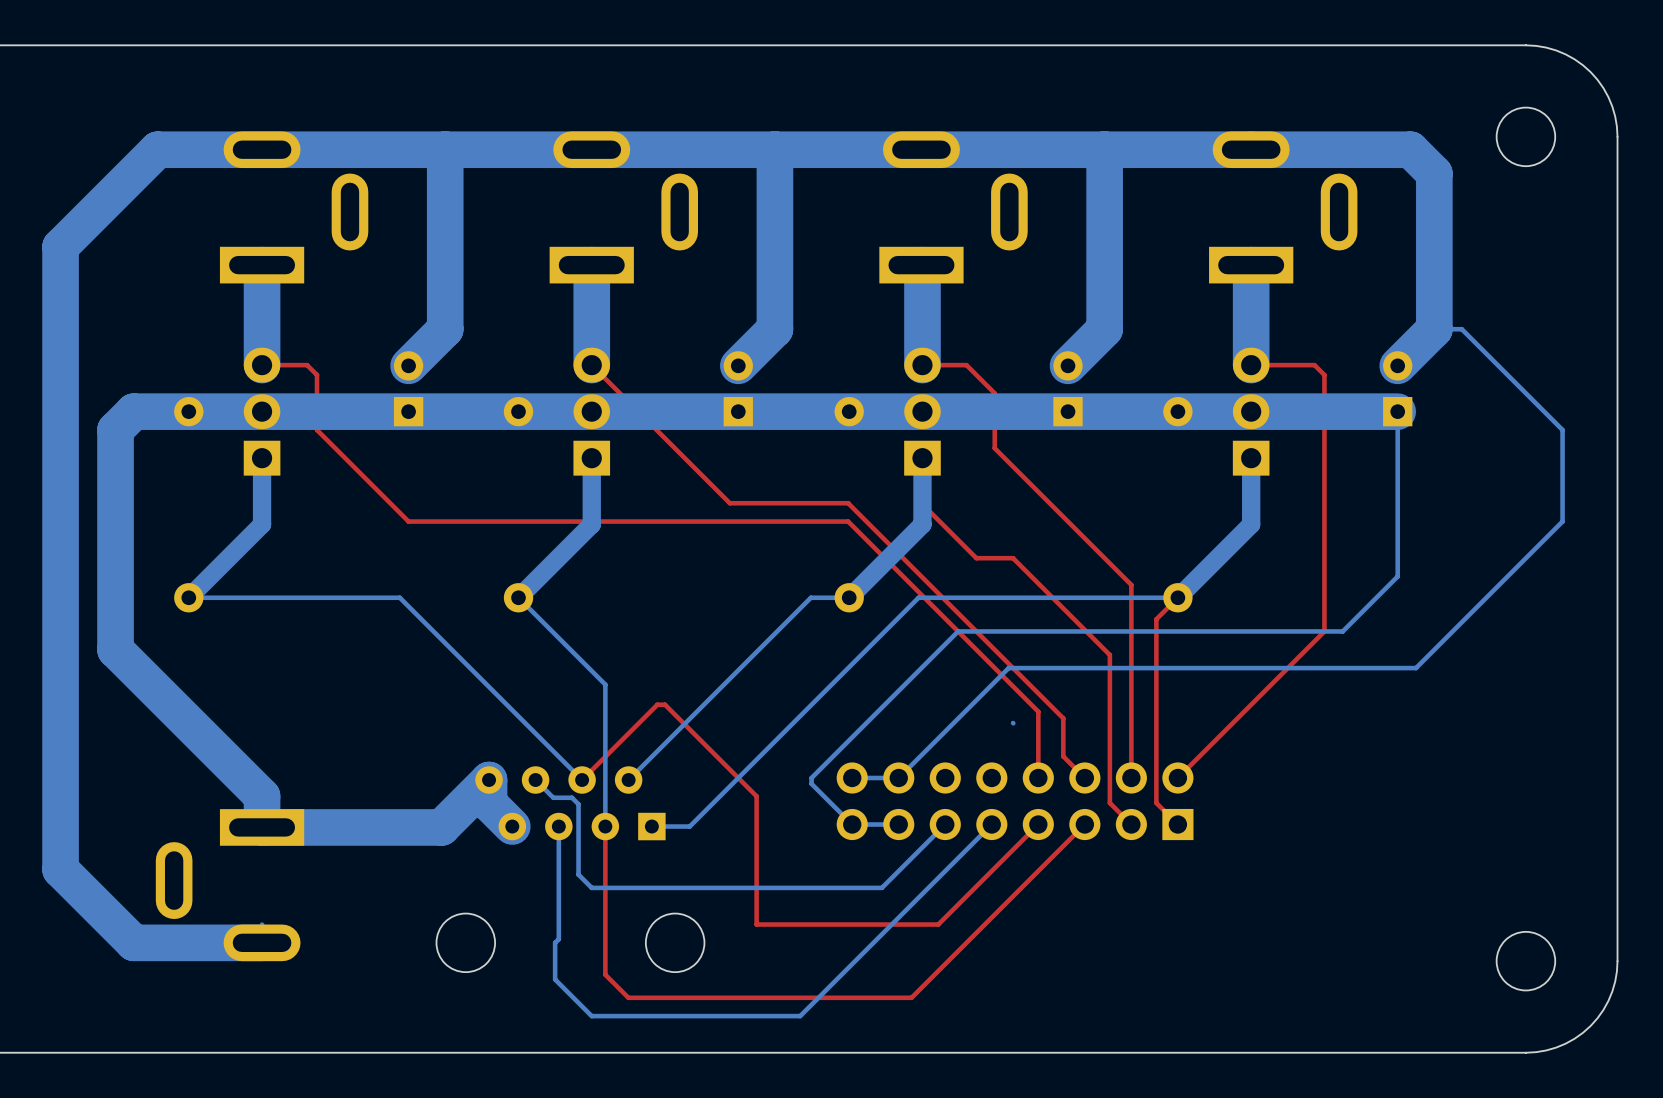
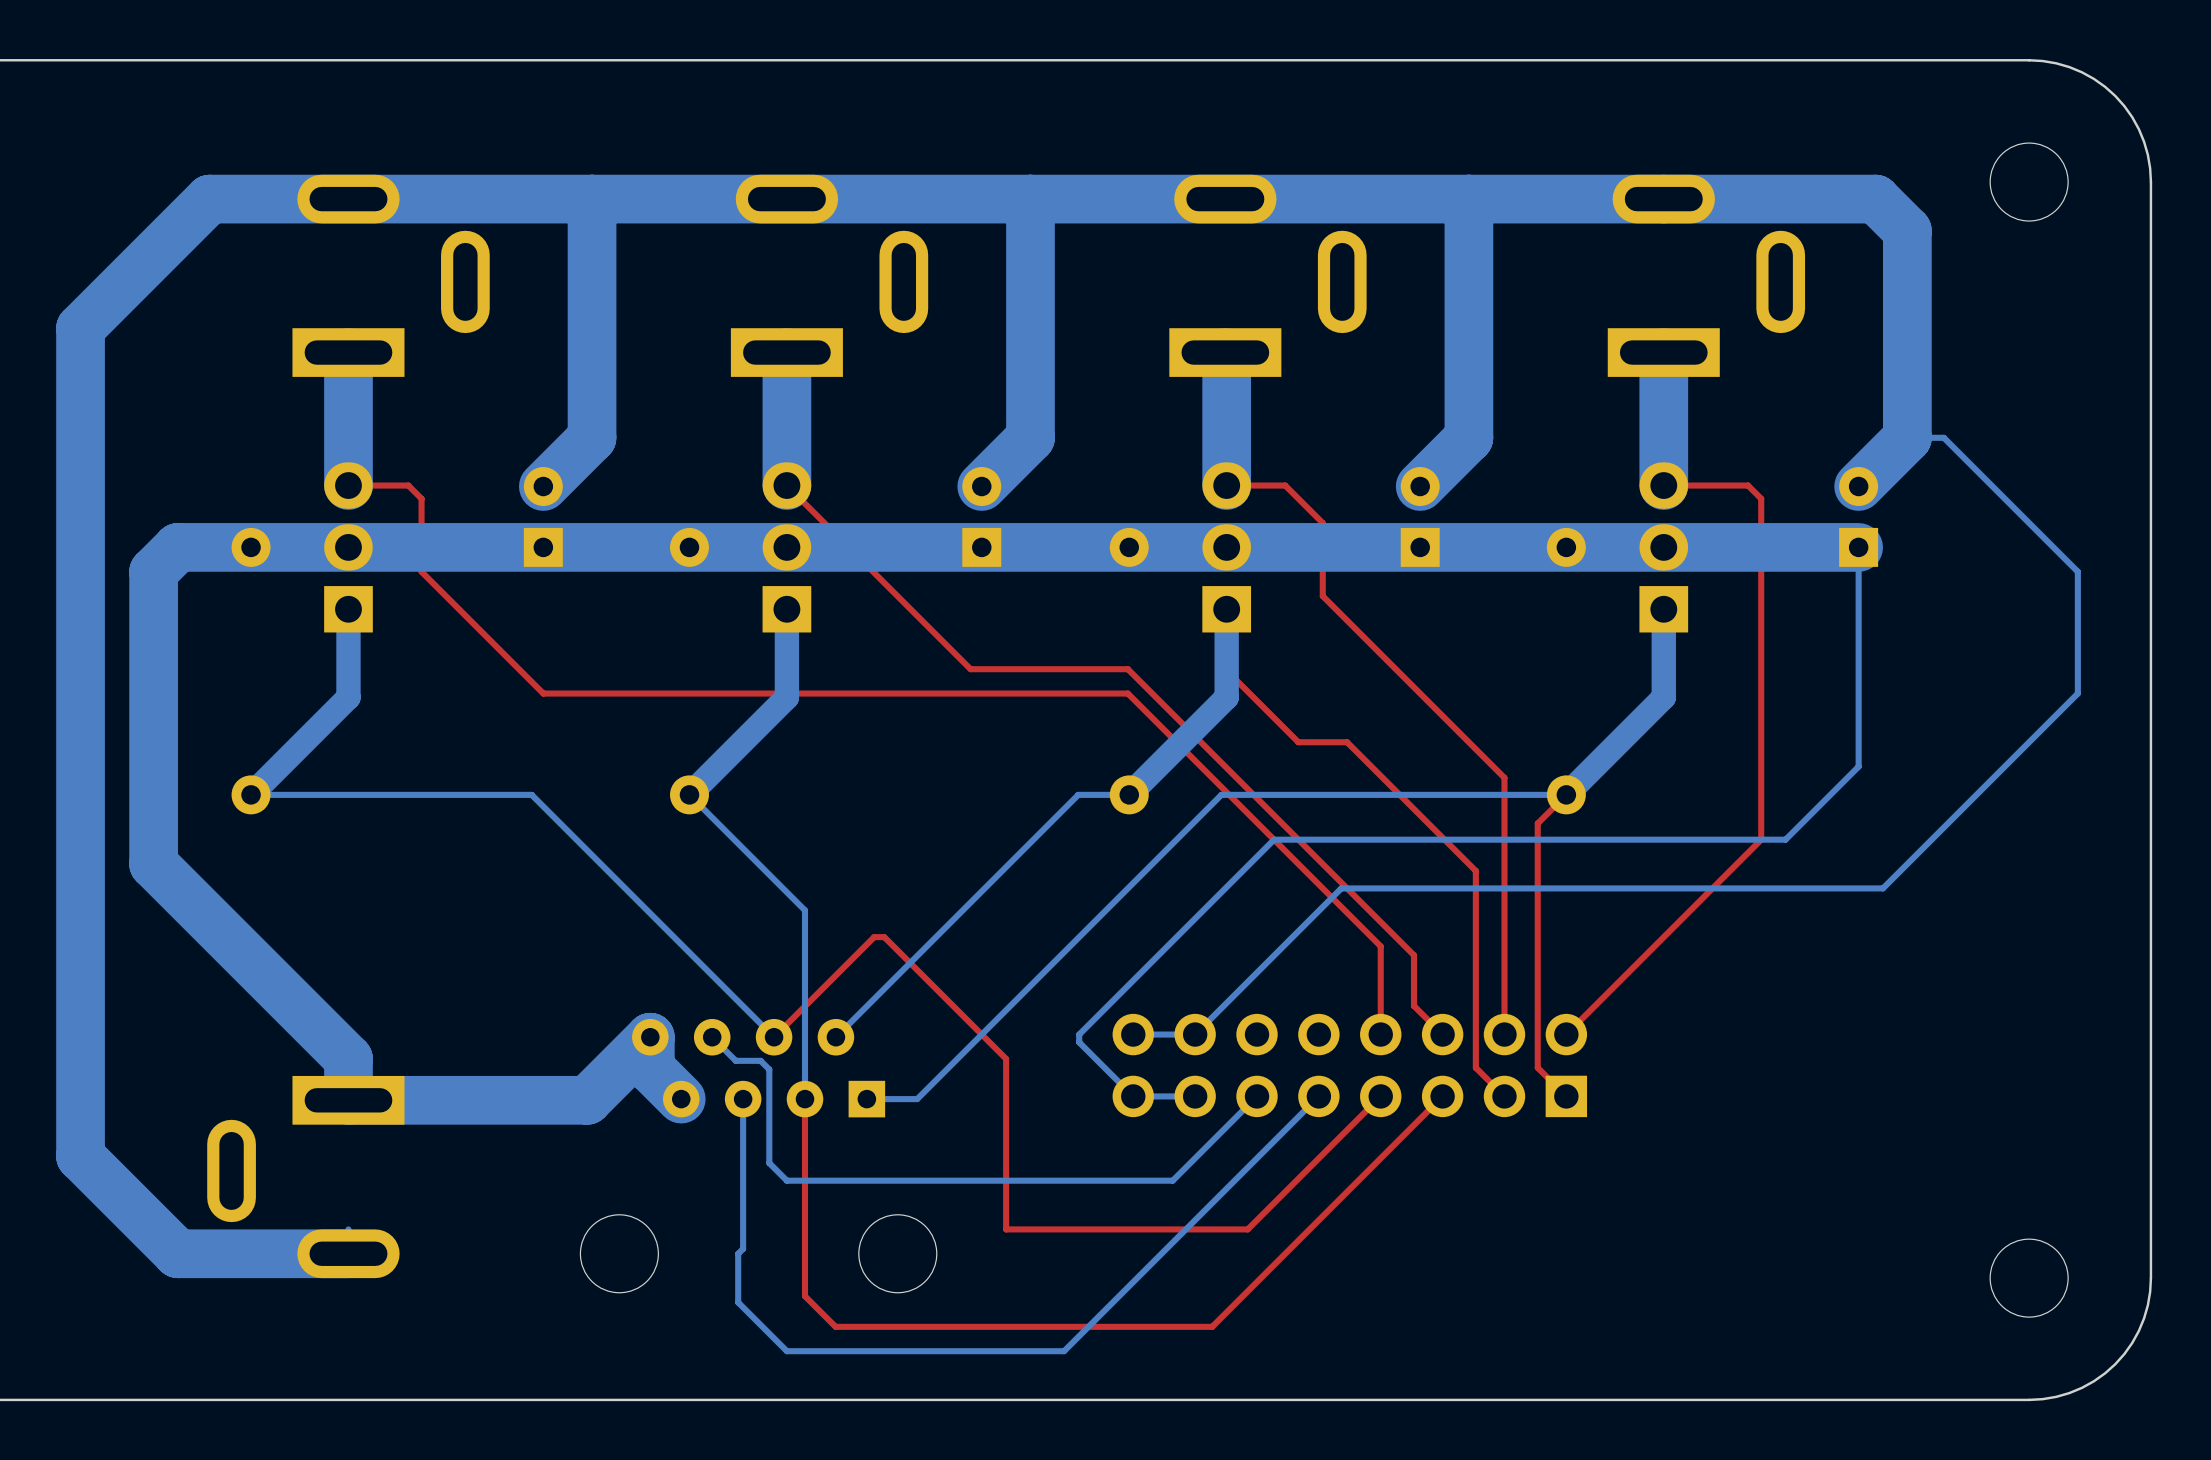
bottom track: (1013, 723) (1013, 723) -> none

